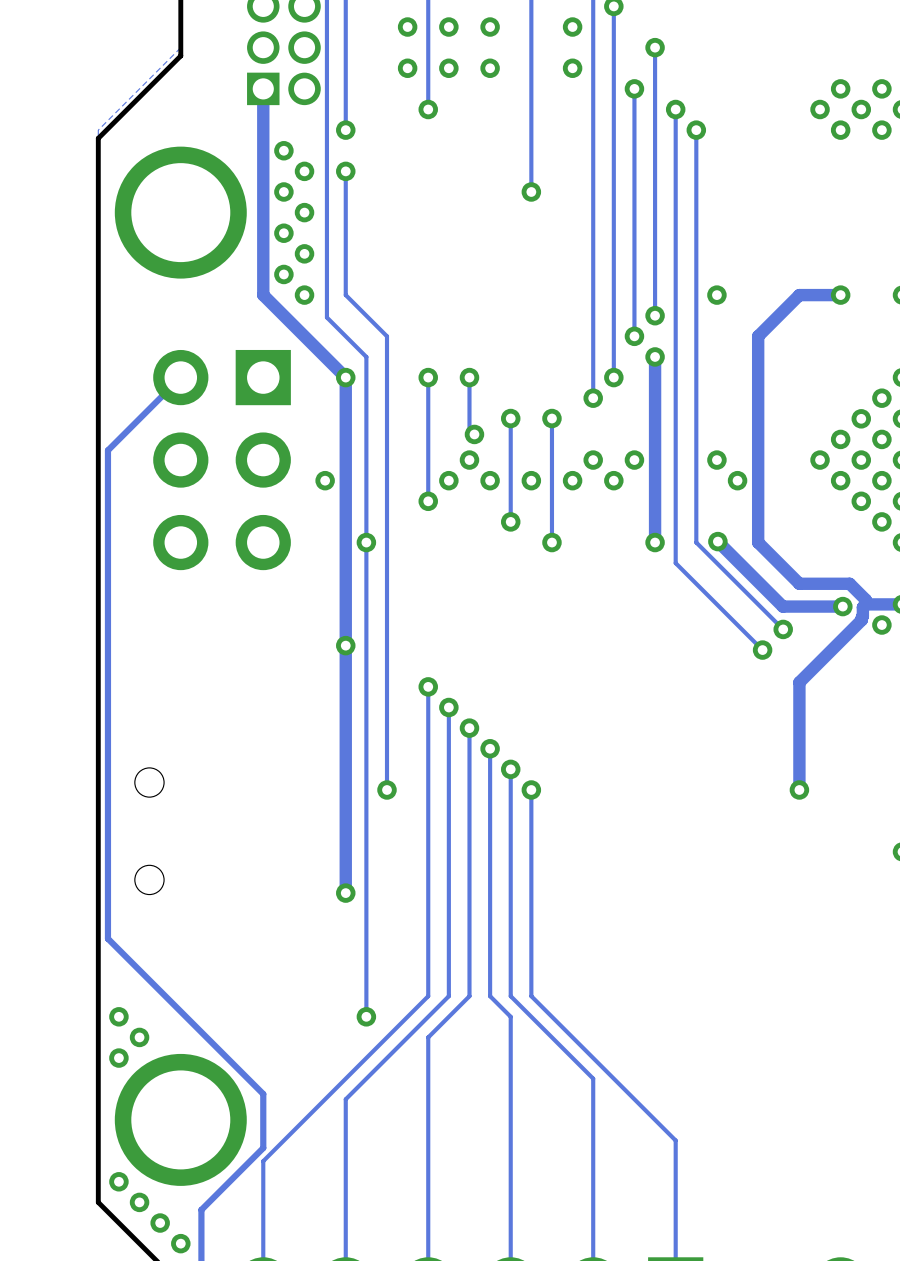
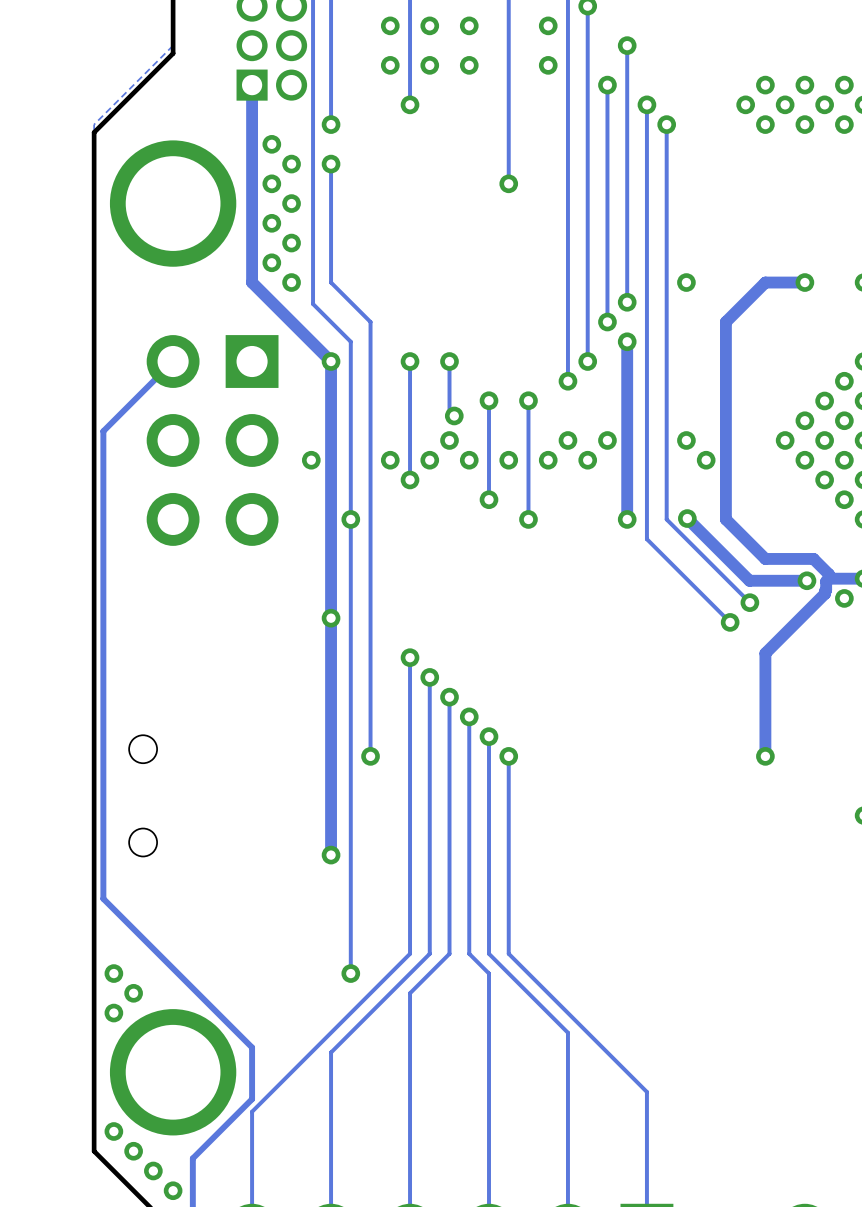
via: none -> (765, 85)
via: none -> (745, 104)
via: none -> (765, 124)
via: none -> (390, 460)

